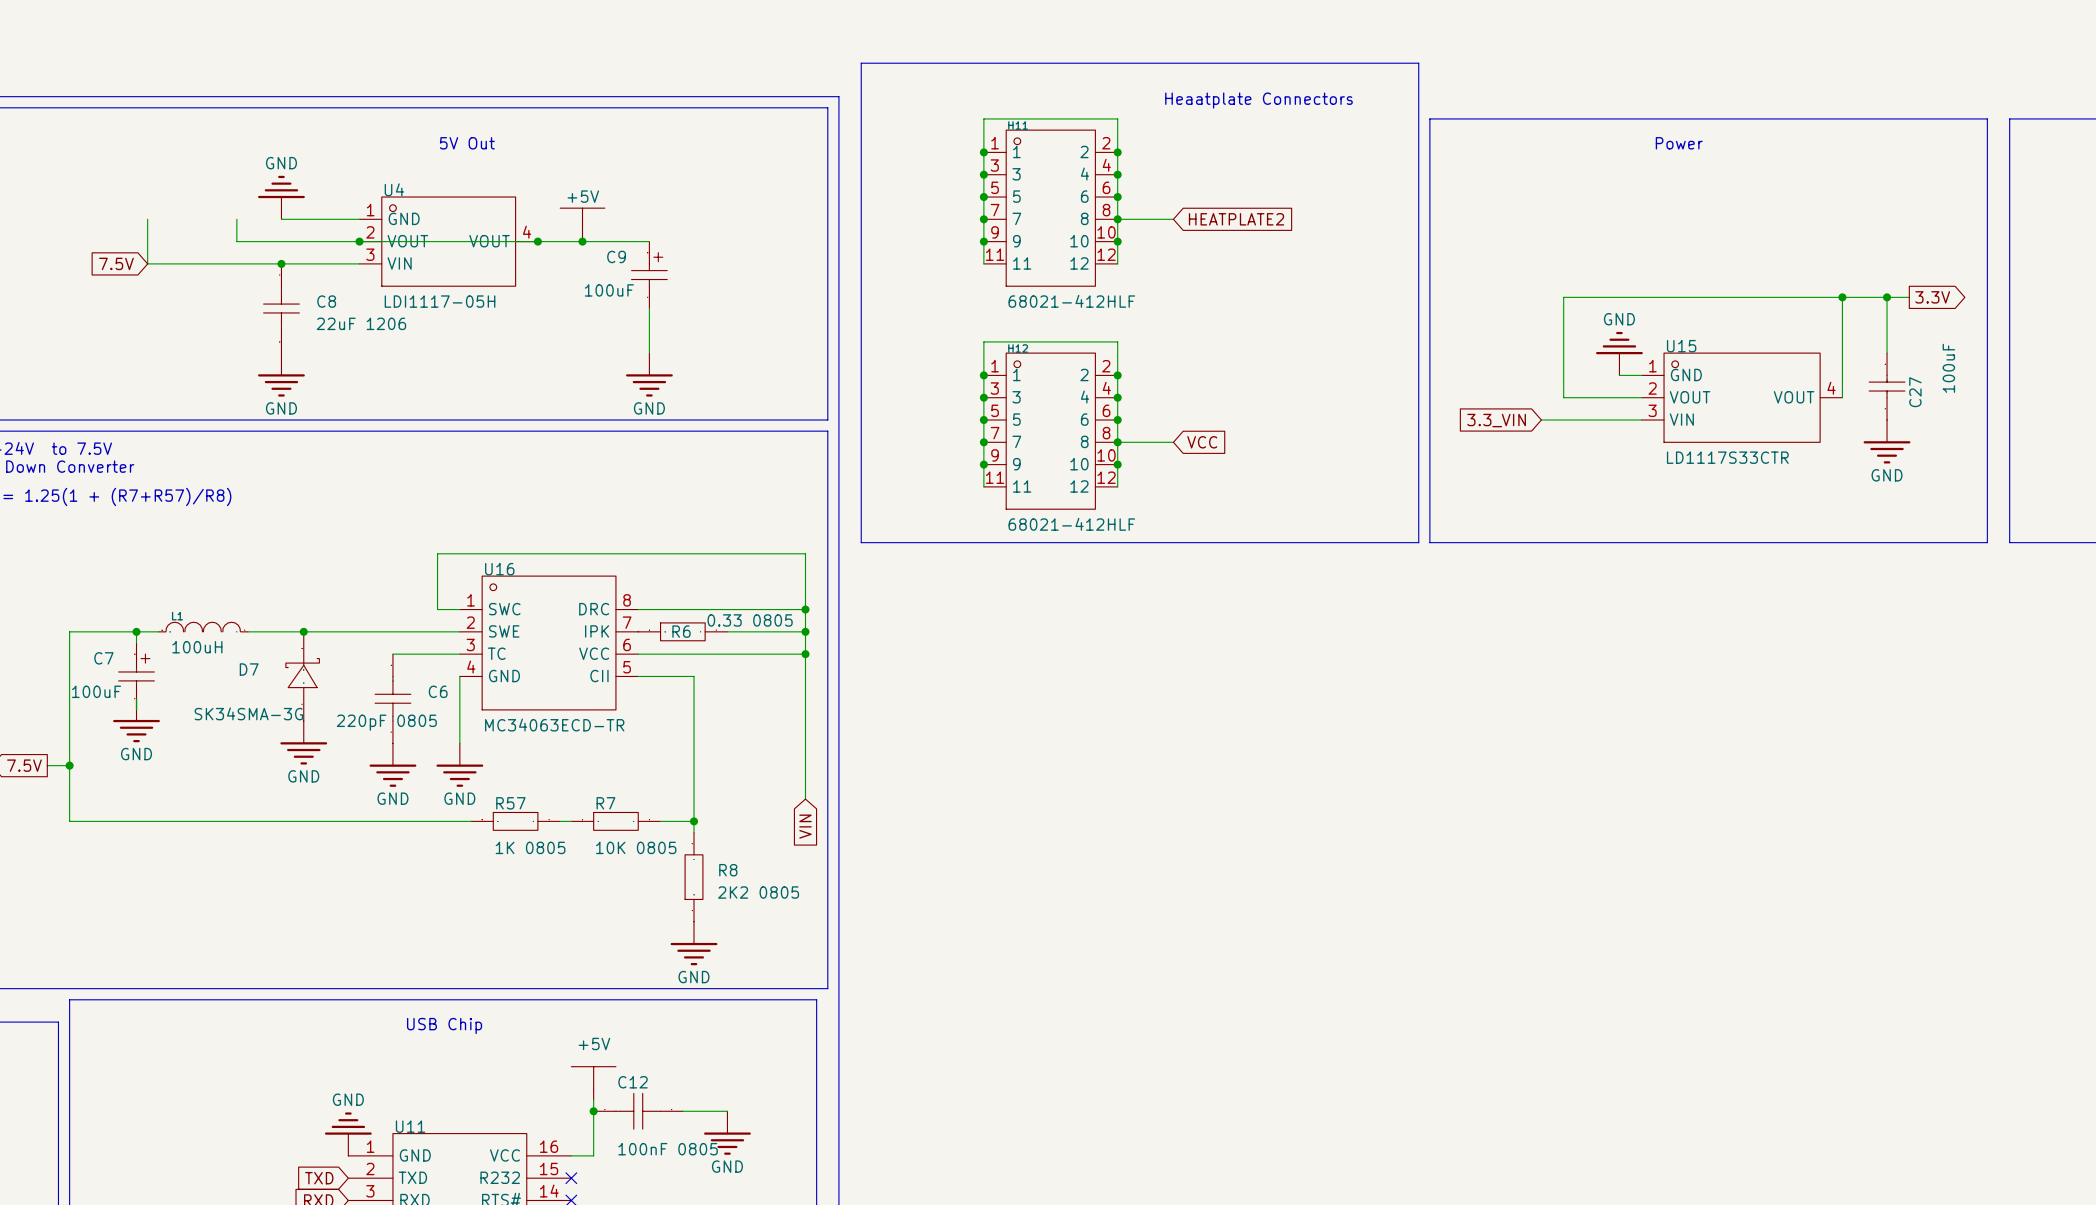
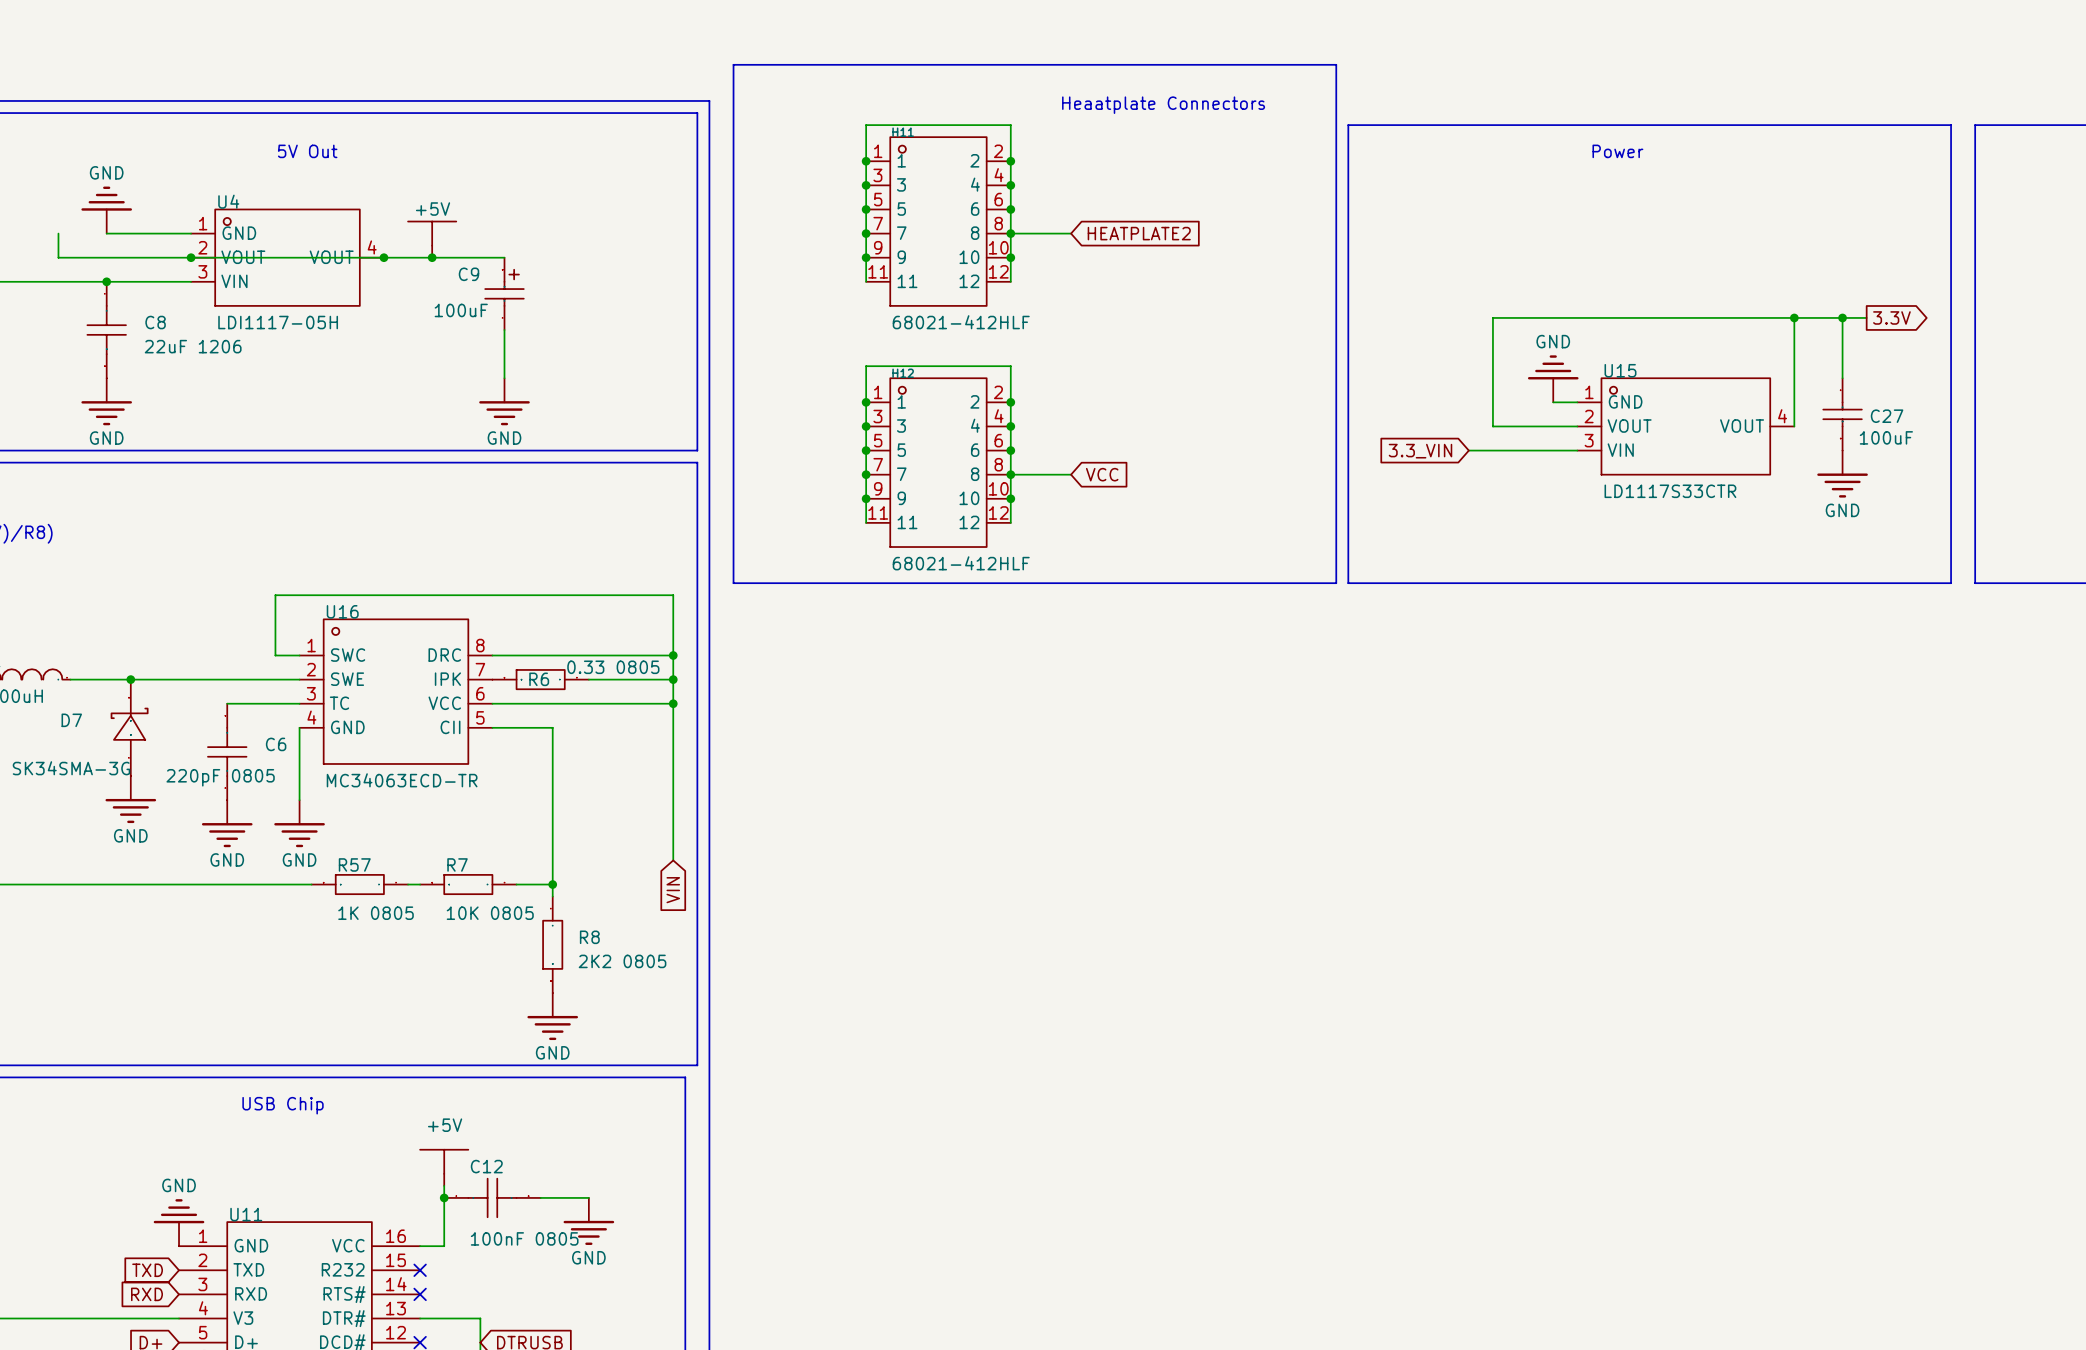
C27 value position: 100uF (1948, 368) -> 100uF (1886, 437)
C27 rotation: 0° (1887, 386) -> 180° (1842, 414)

